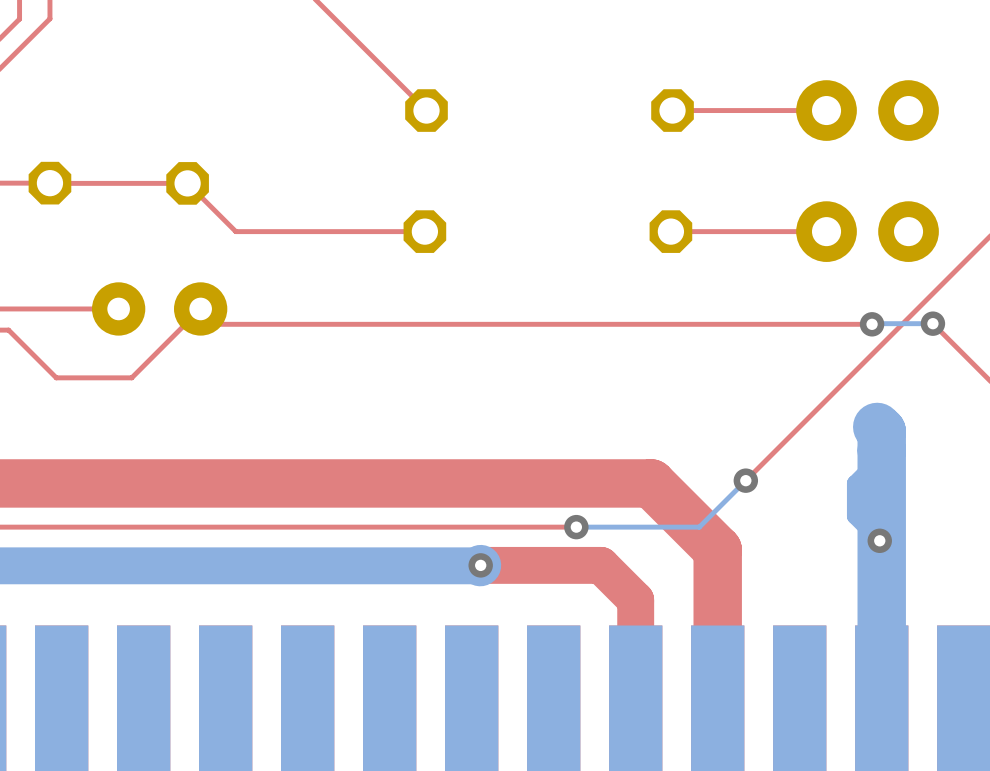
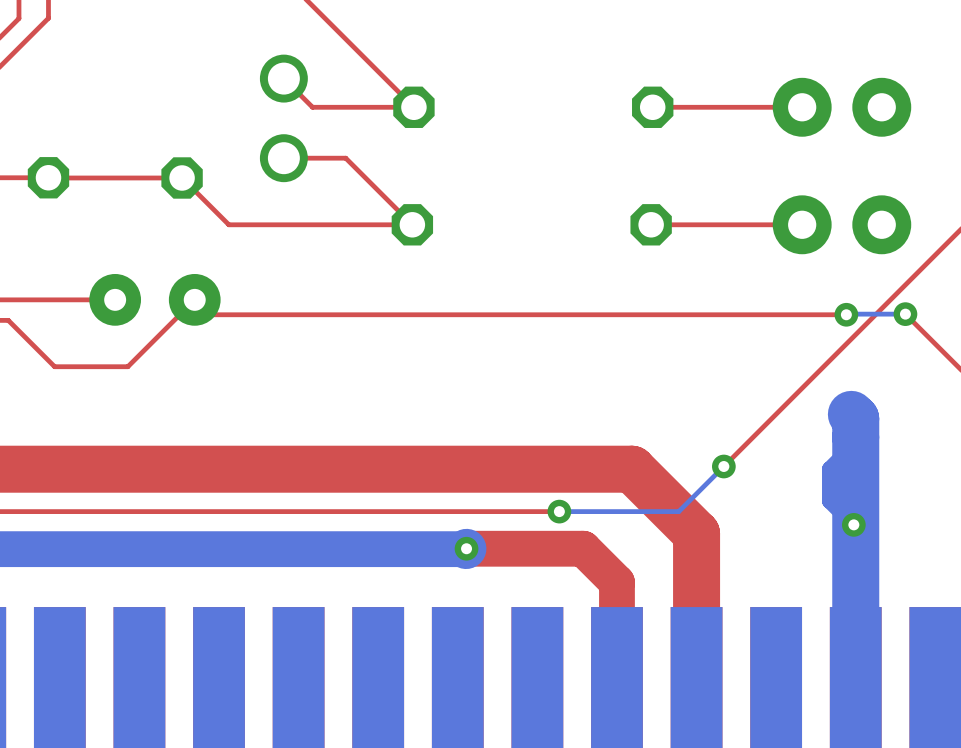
top track: none -> (283, 78) (312, 107) (413, 107)
part: none -> (283, 118)
top track: none -> (283, 158) (345, 158) (412, 224)

